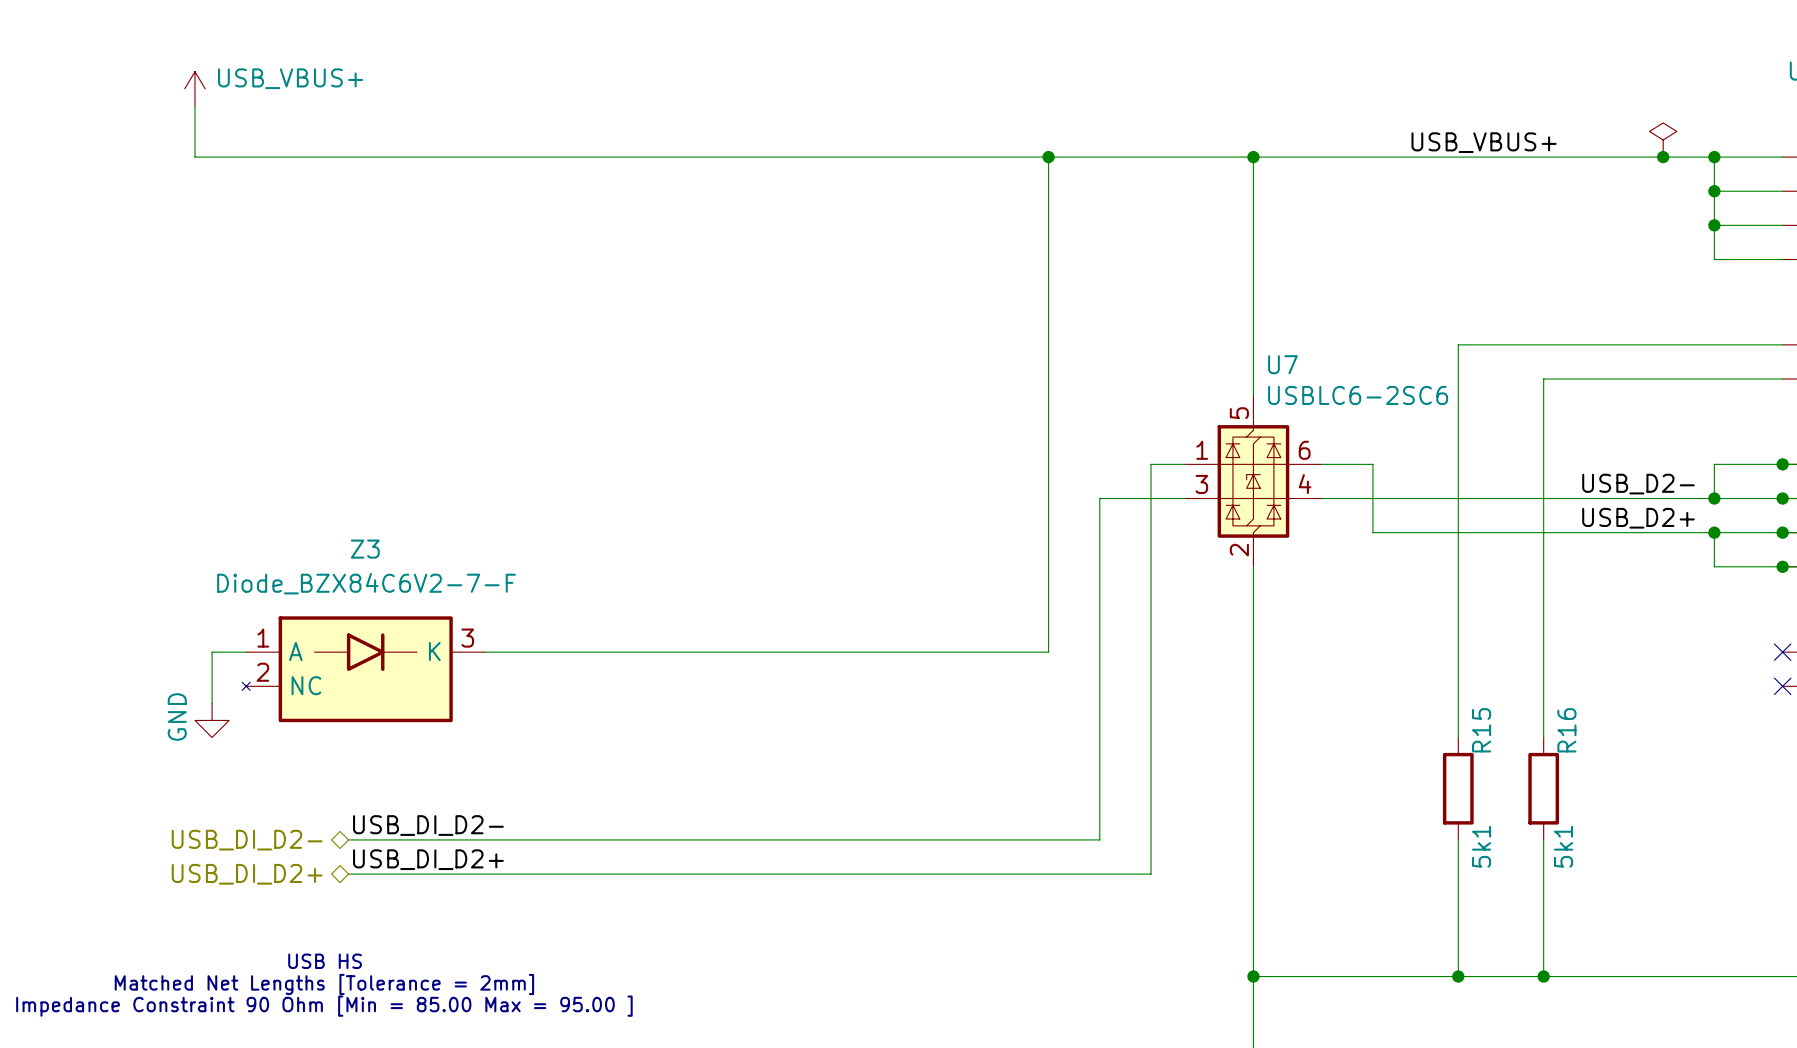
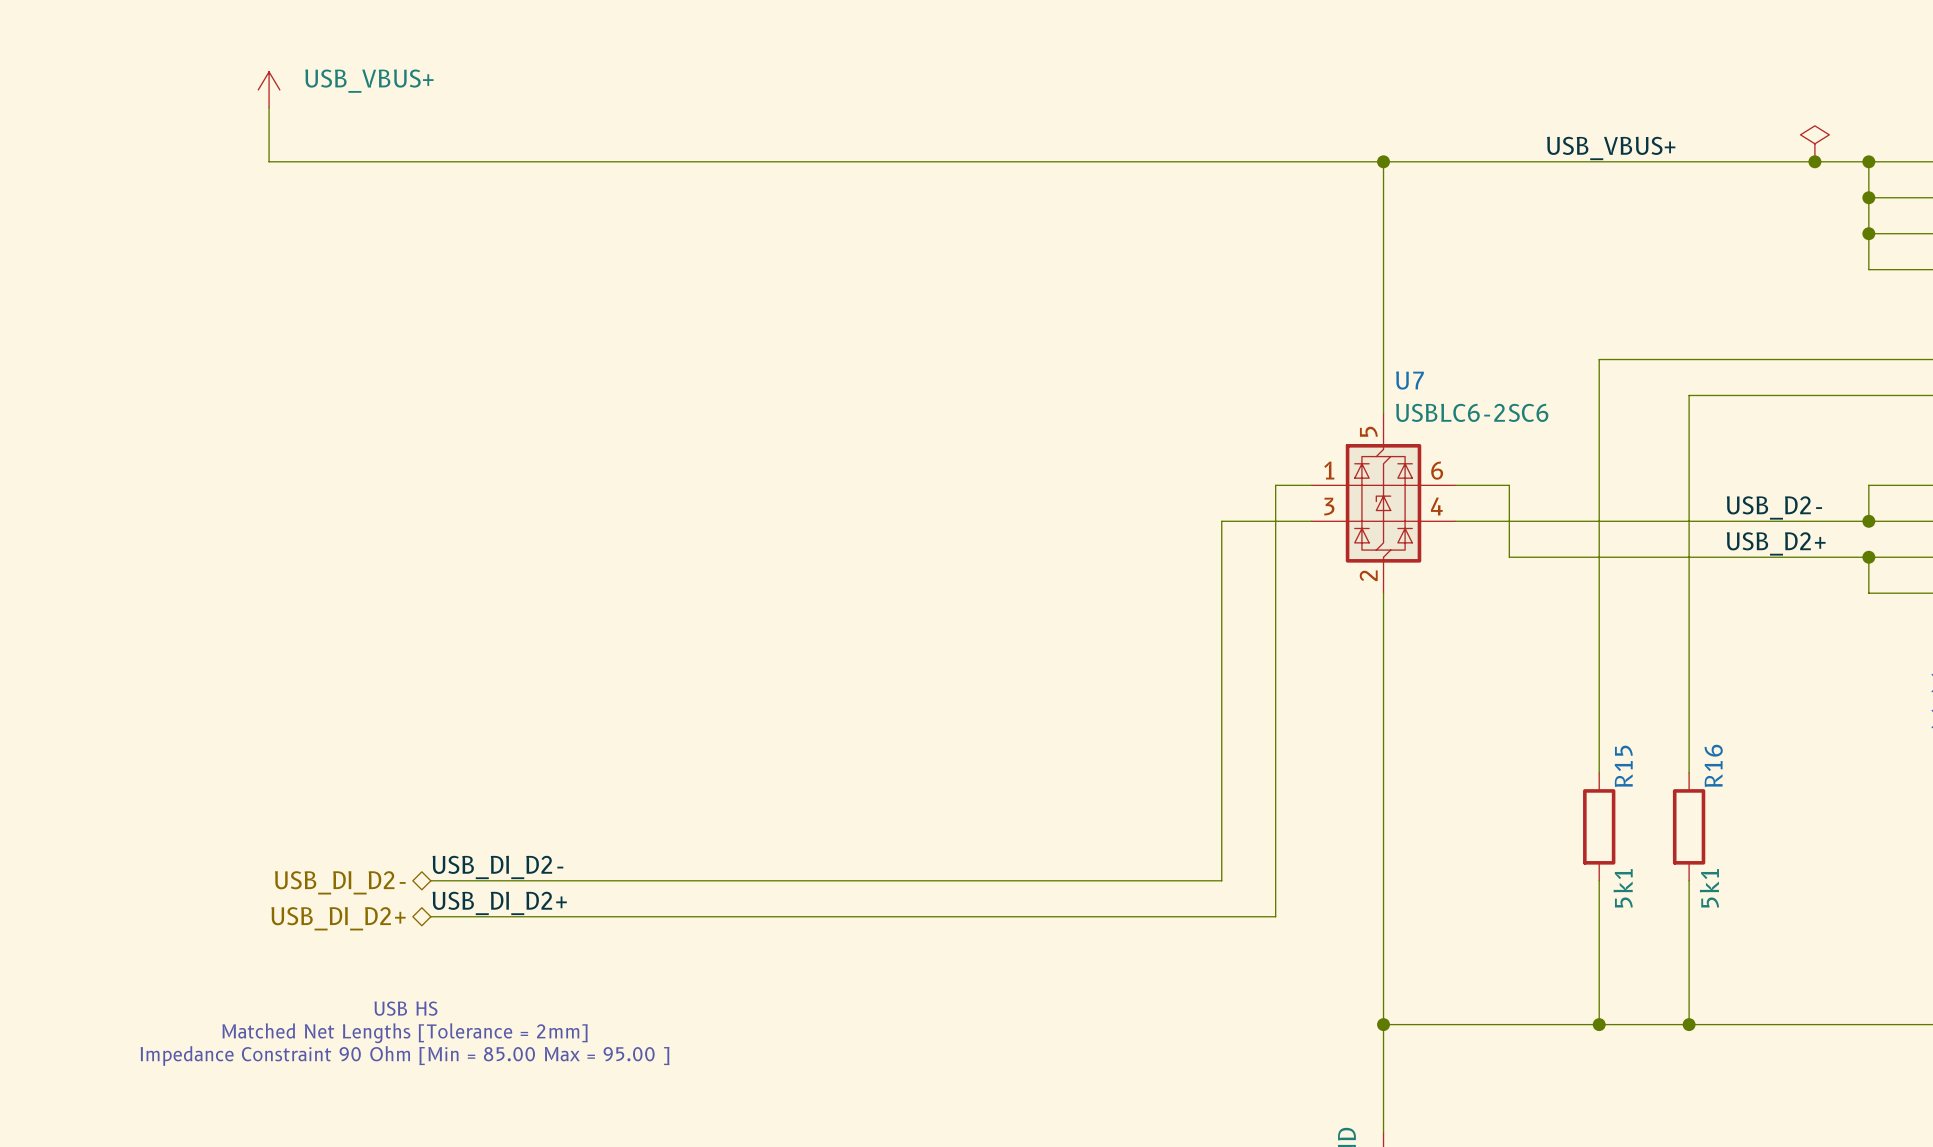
wire: (1048, 157) (1048, 652) (485, 652) -> none
junction: (1048, 157) -> none
wire: (246, 652) (212, 652) (212, 703) -> none
Z3: Diode_BZX84C6V2-7-F (363, 669) -> none
power symbol: GND (212, 720) -> none

